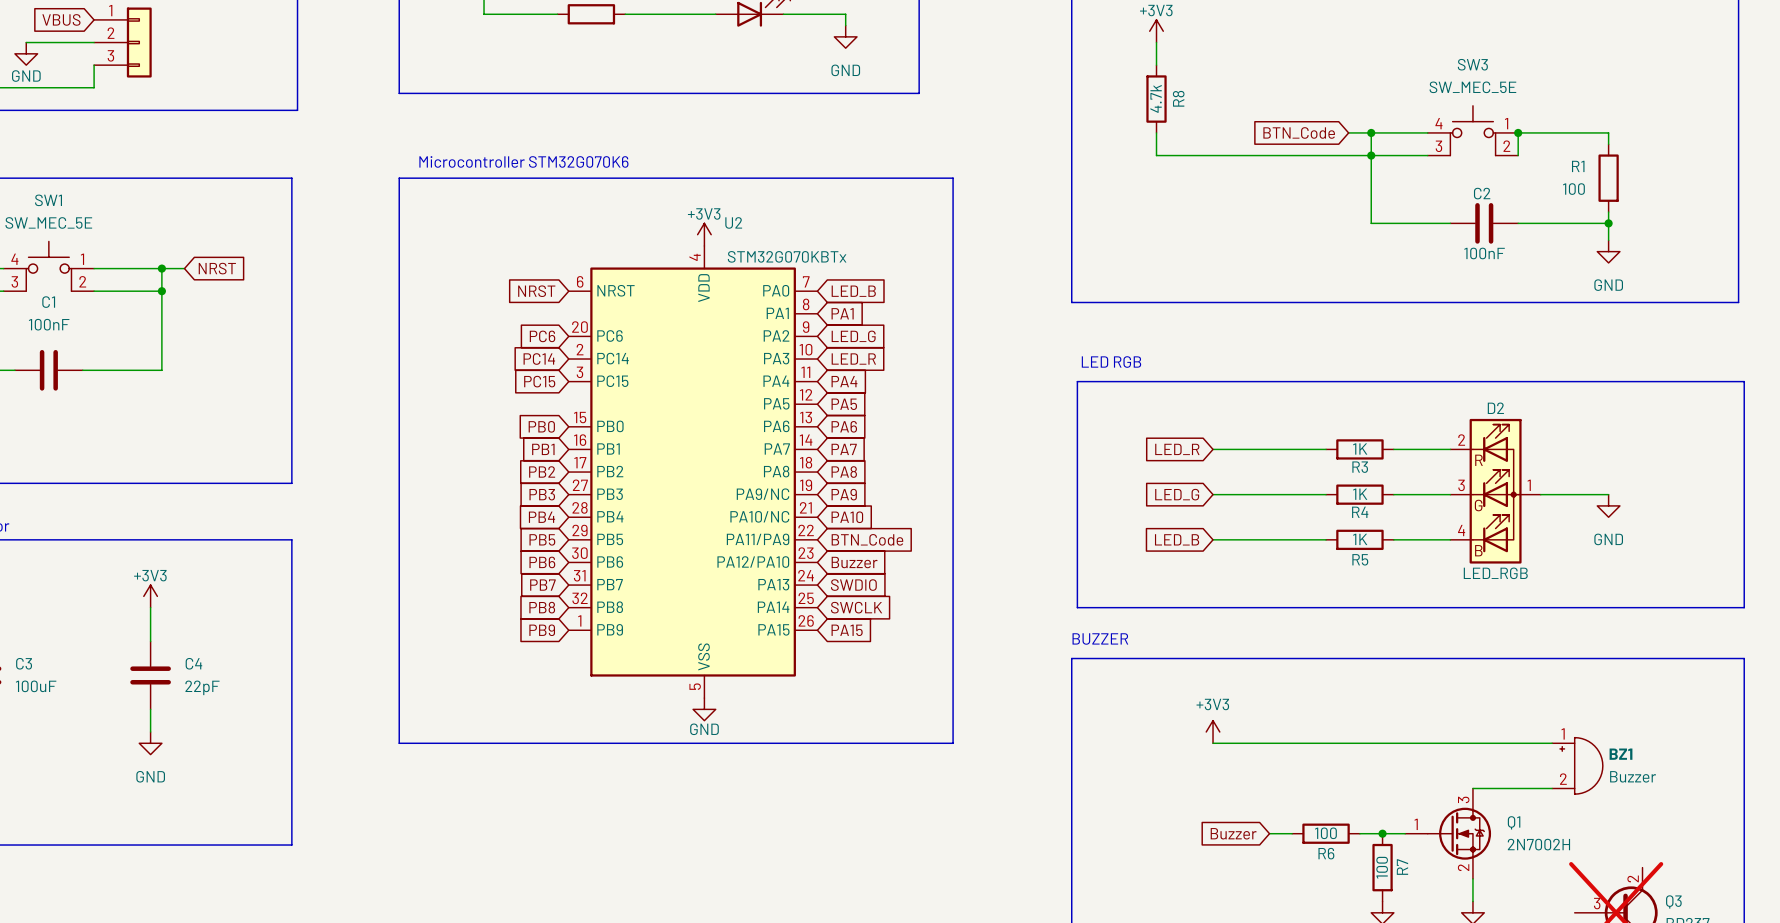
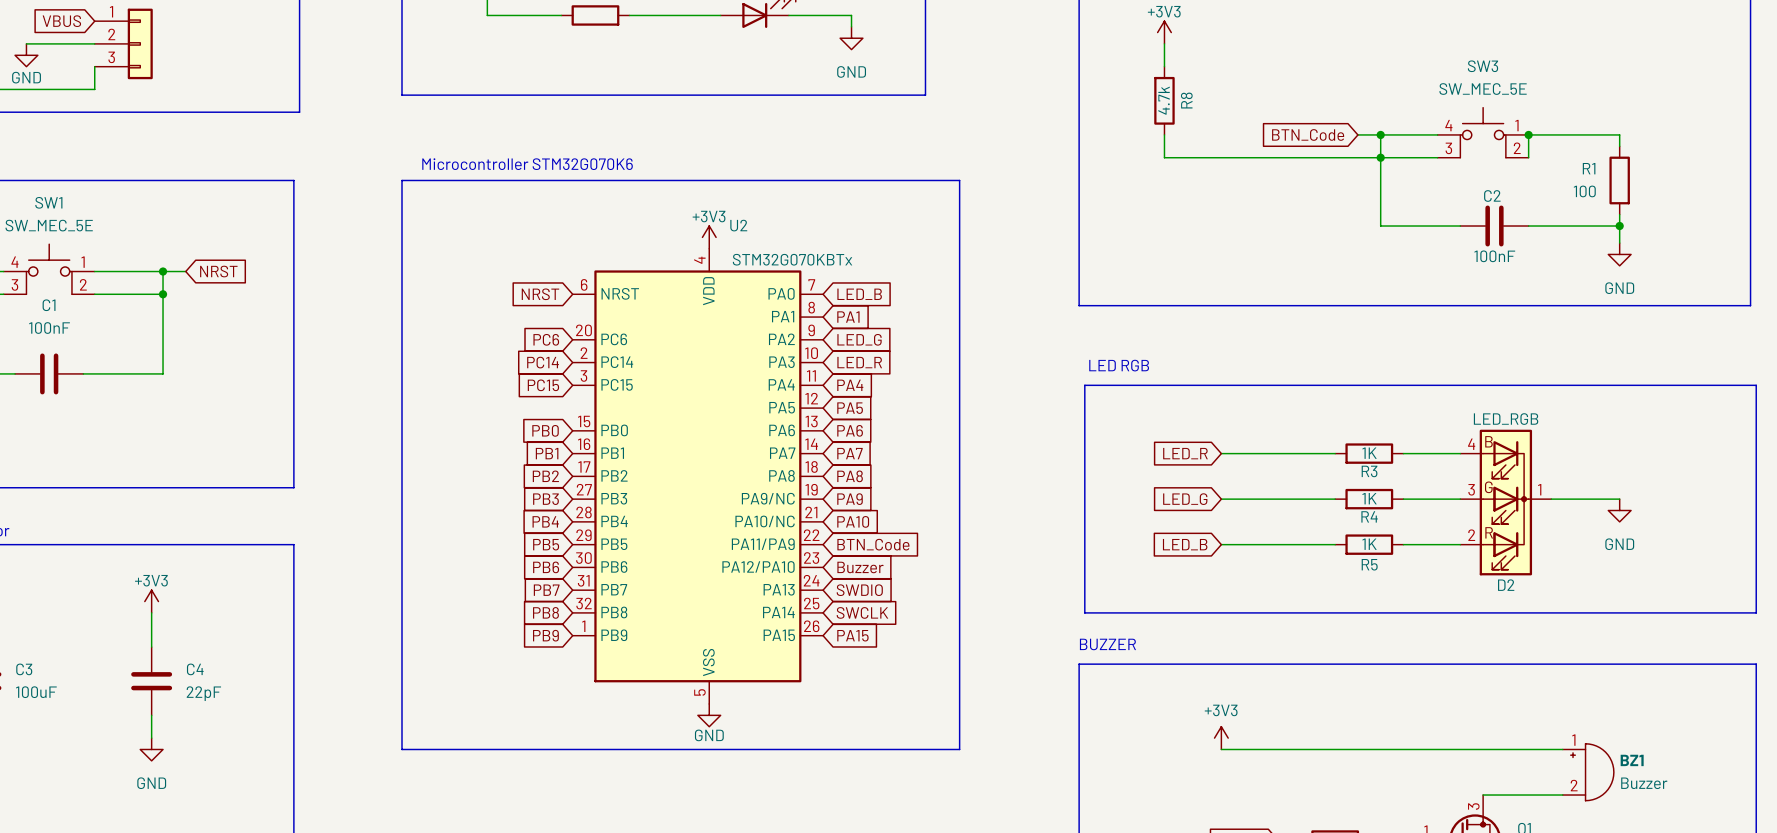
D2 name position: D2 (1495, 408) -> D2 (1506, 585)
D2 symbol: [1450, 418, 1541, 564] -> [1460, 429, 1552, 576]
D2 value position: LED_RGB (1495, 573) -> LED_RGB (1506, 419)

